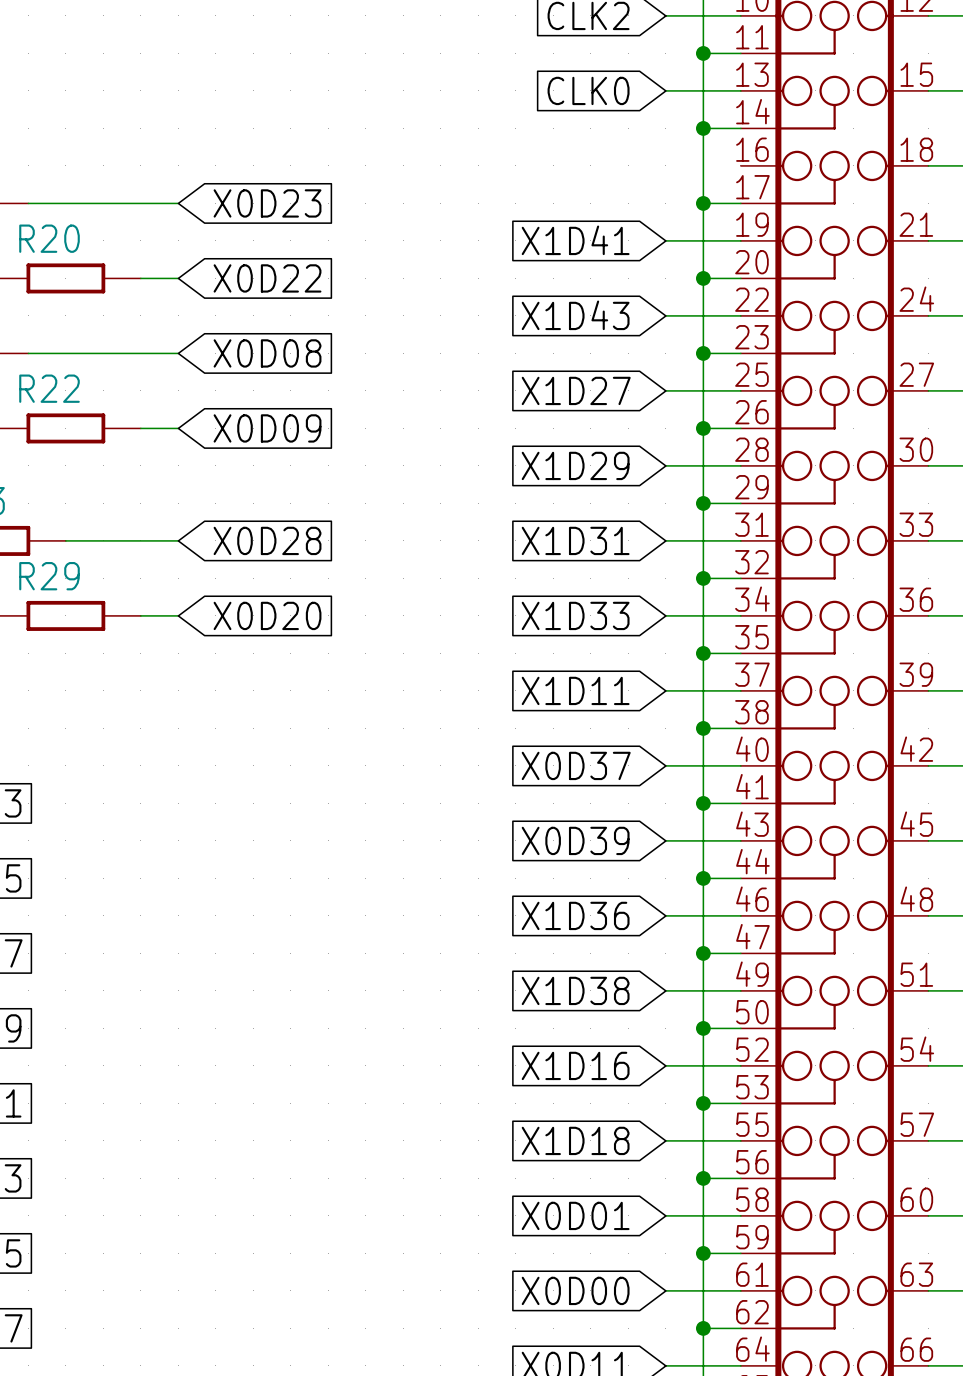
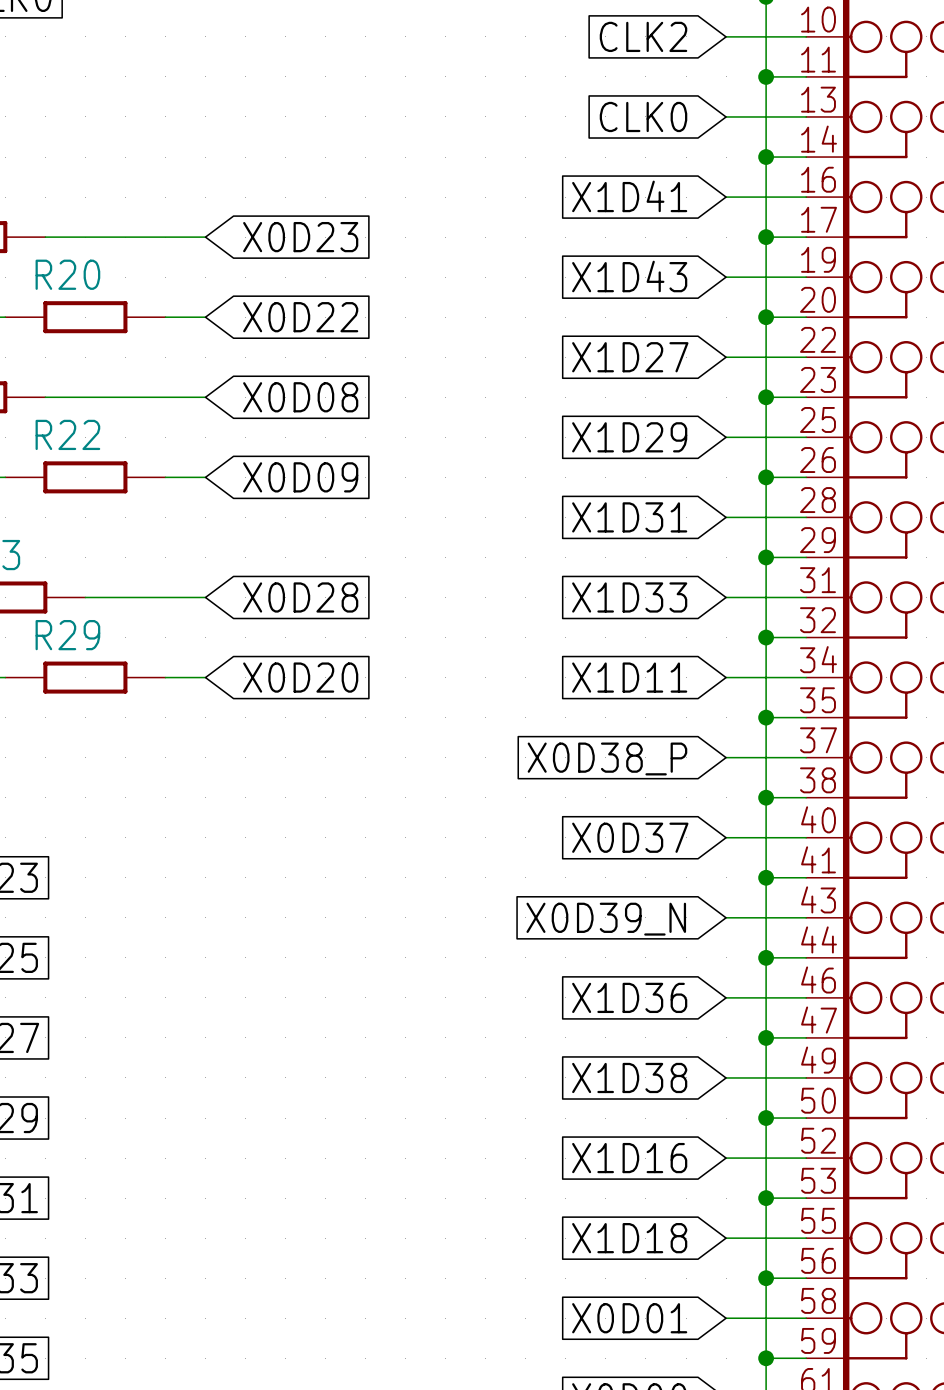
global label: none -> X1D41 (629, 196)
wire: none -> (726, 197) (806, 197)
global label: X1D41 (575, 240) -> X1D43 (629, 276)
global label: X1D43 (575, 315) -> X1D27 (630, 357)
global label: X1D27 (576, 390) -> X1D29 (629, 437)
global label: X1D29 (575, 465) -> X1D31 (629, 517)
global label: X1D31 (575, 540) -> X1D33 (629, 597)
global label: X1D33 (575, 615) -> X1D11 (629, 677)
global label: X1D11 (575, 690) -> X0D38_P (607, 758)
global label: X0D39 (575, 840) -> X0D39_N (606, 919)

